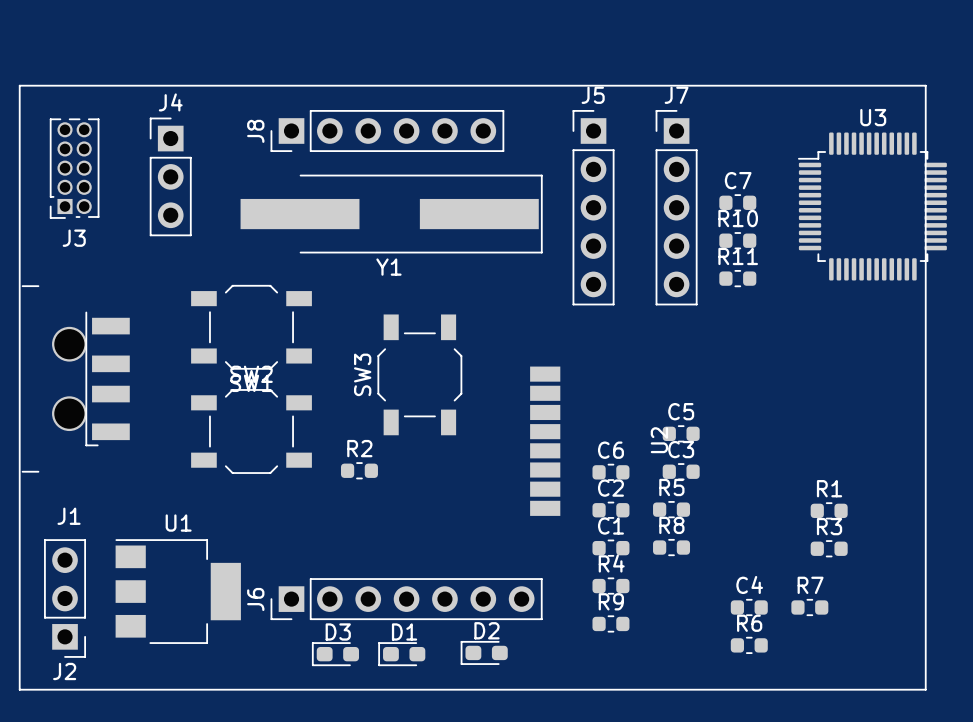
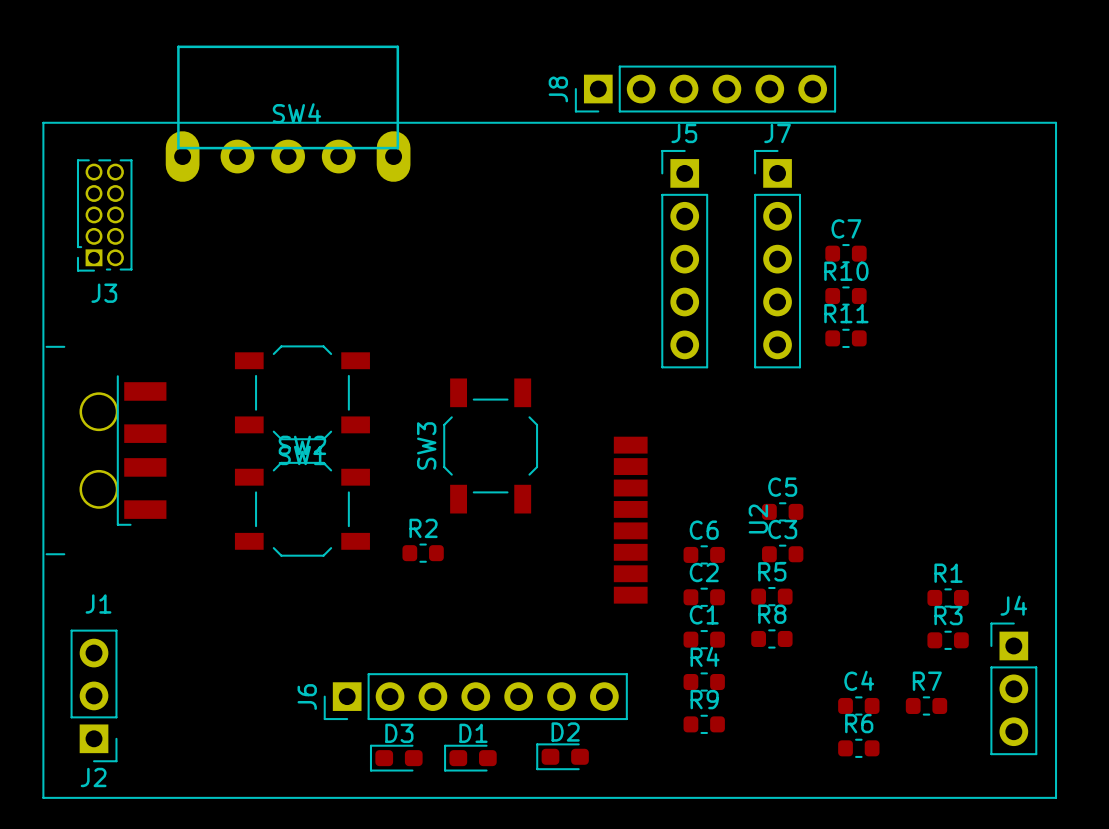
SW4: none -> (288, 113)
J8 position: (387, 131) -> (705, 89)
J4 position: (170, 176) -> (1013, 688)
U3: (872, 206) -> none
Y1: (391, 214) -> none
U1: (178, 591) -> none

